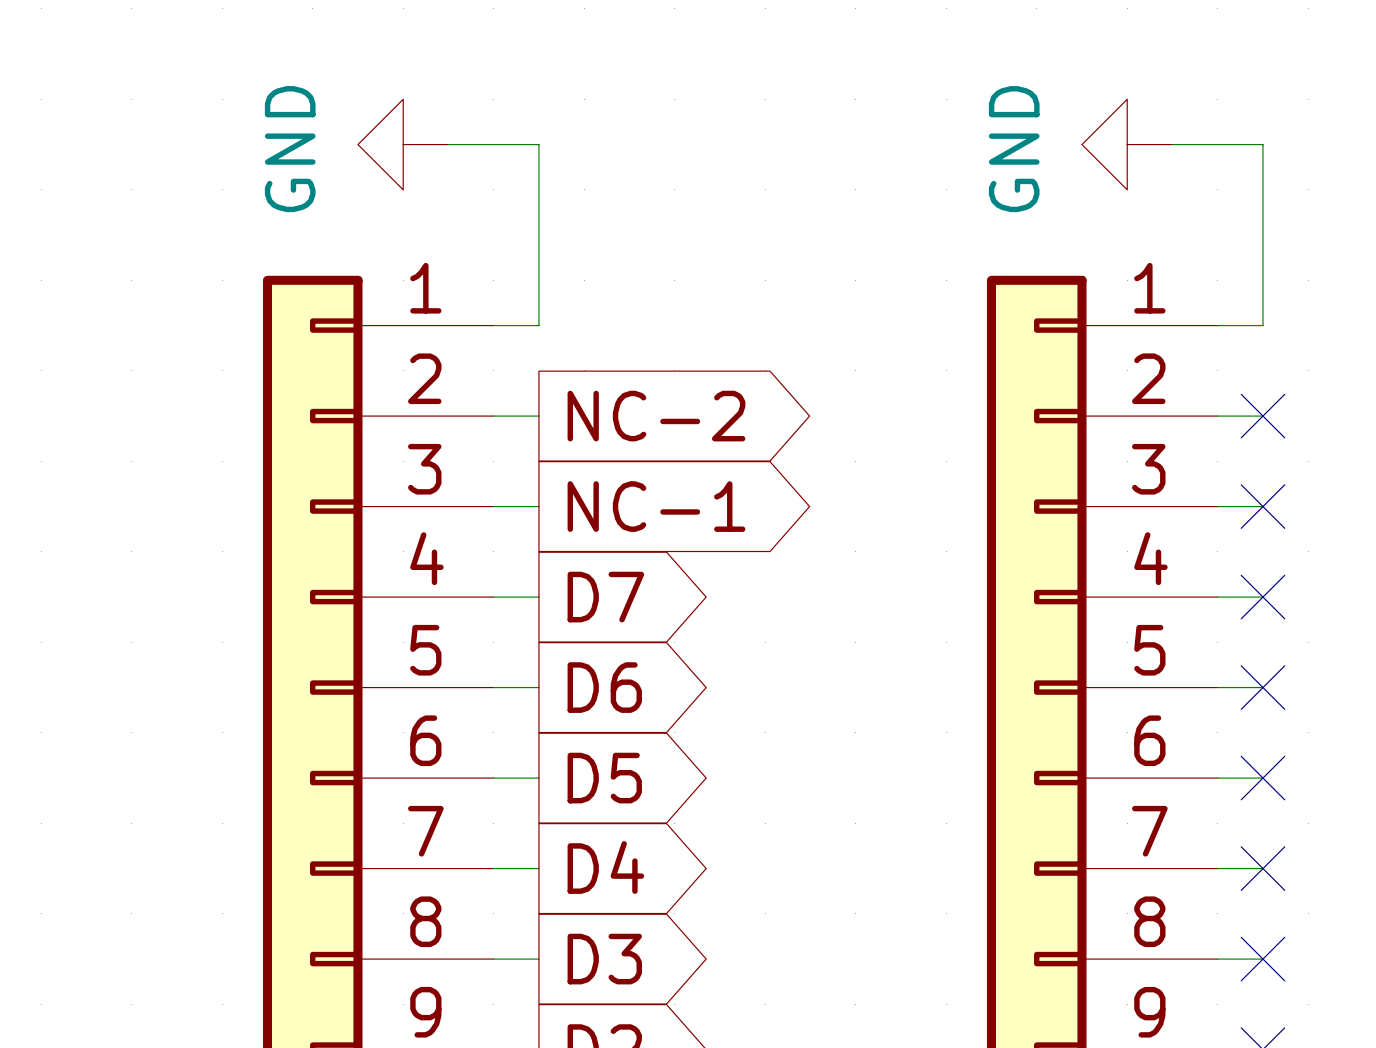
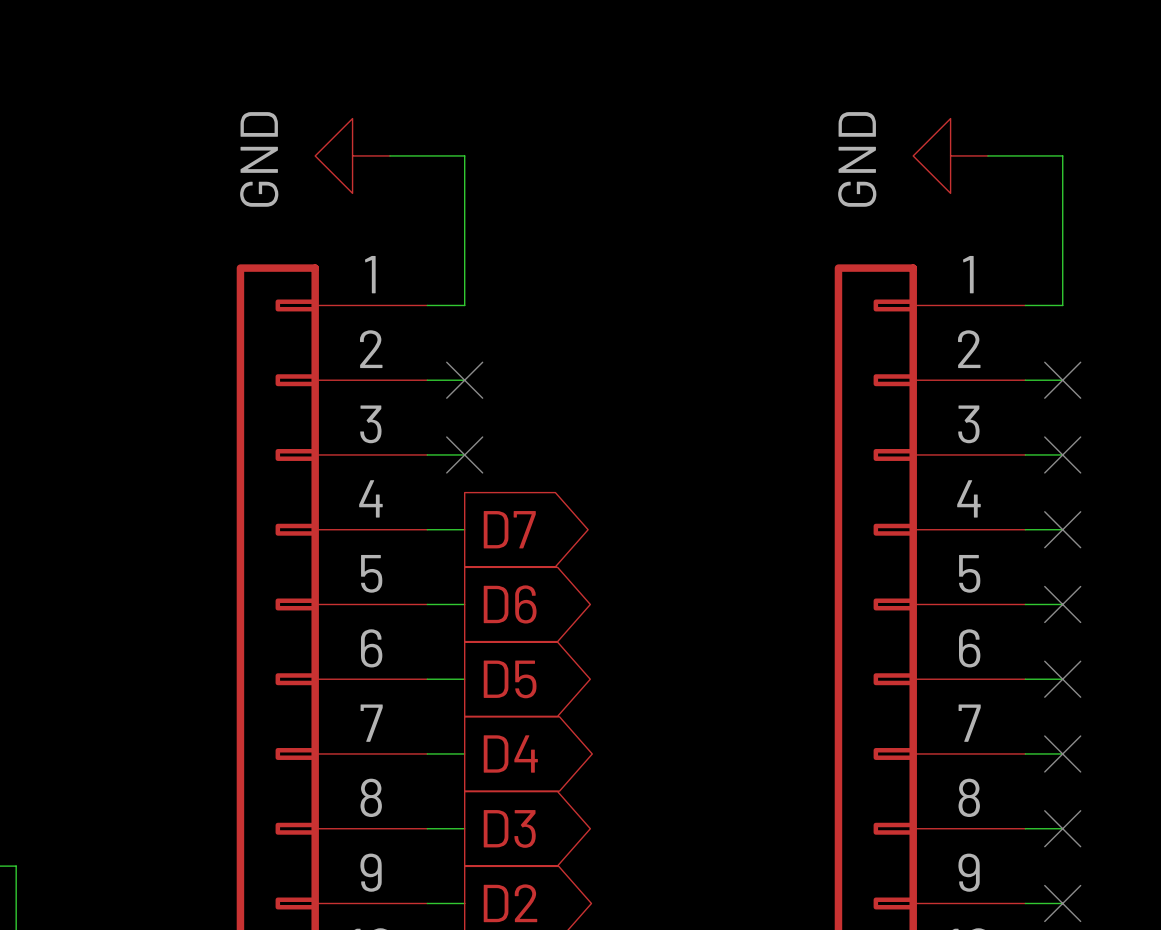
no-connect mark: none -> (464, 380)
global label: NC-2 (656, 416) -> none
no-connect mark: none -> (464, 454)
global label: NC-1 (656, 506) -> none

